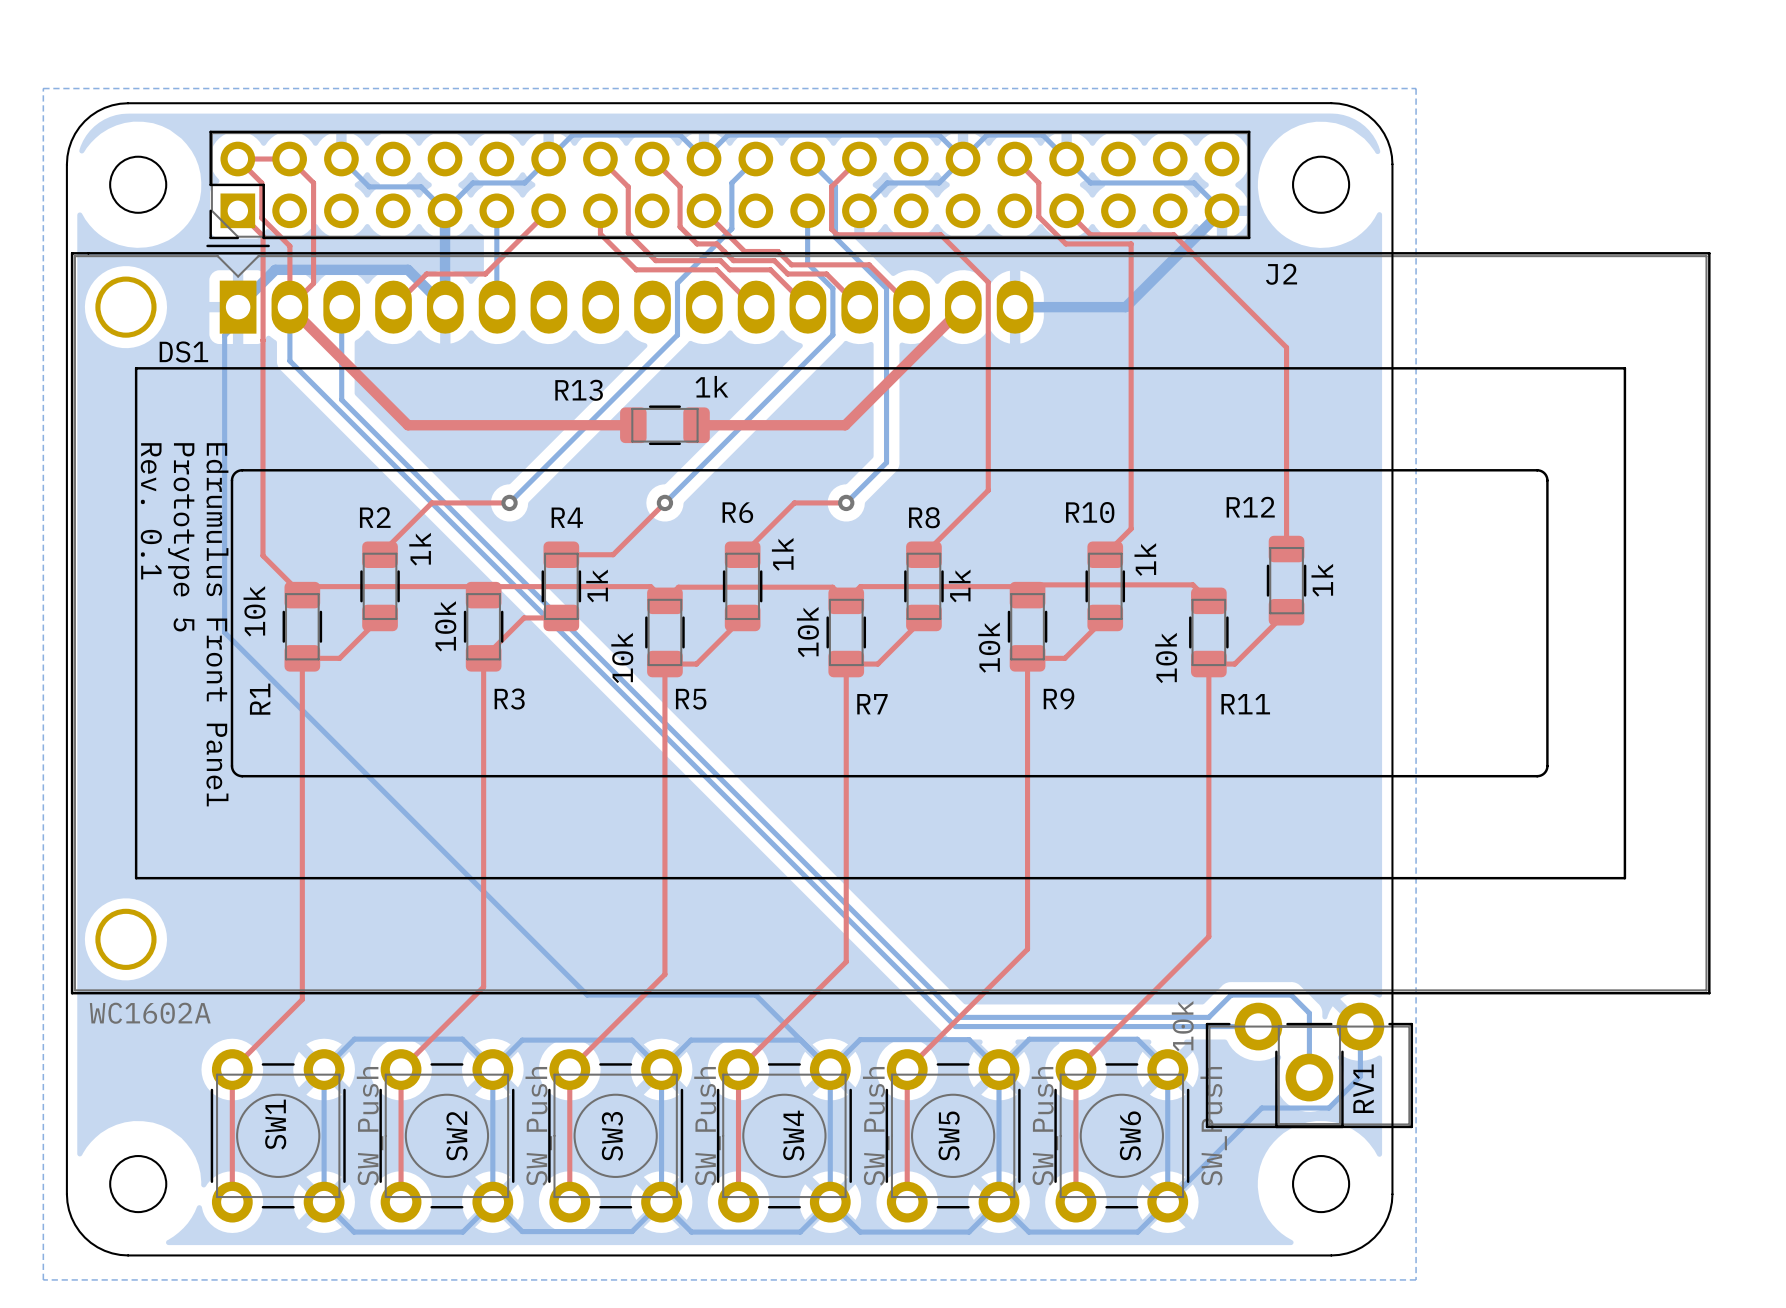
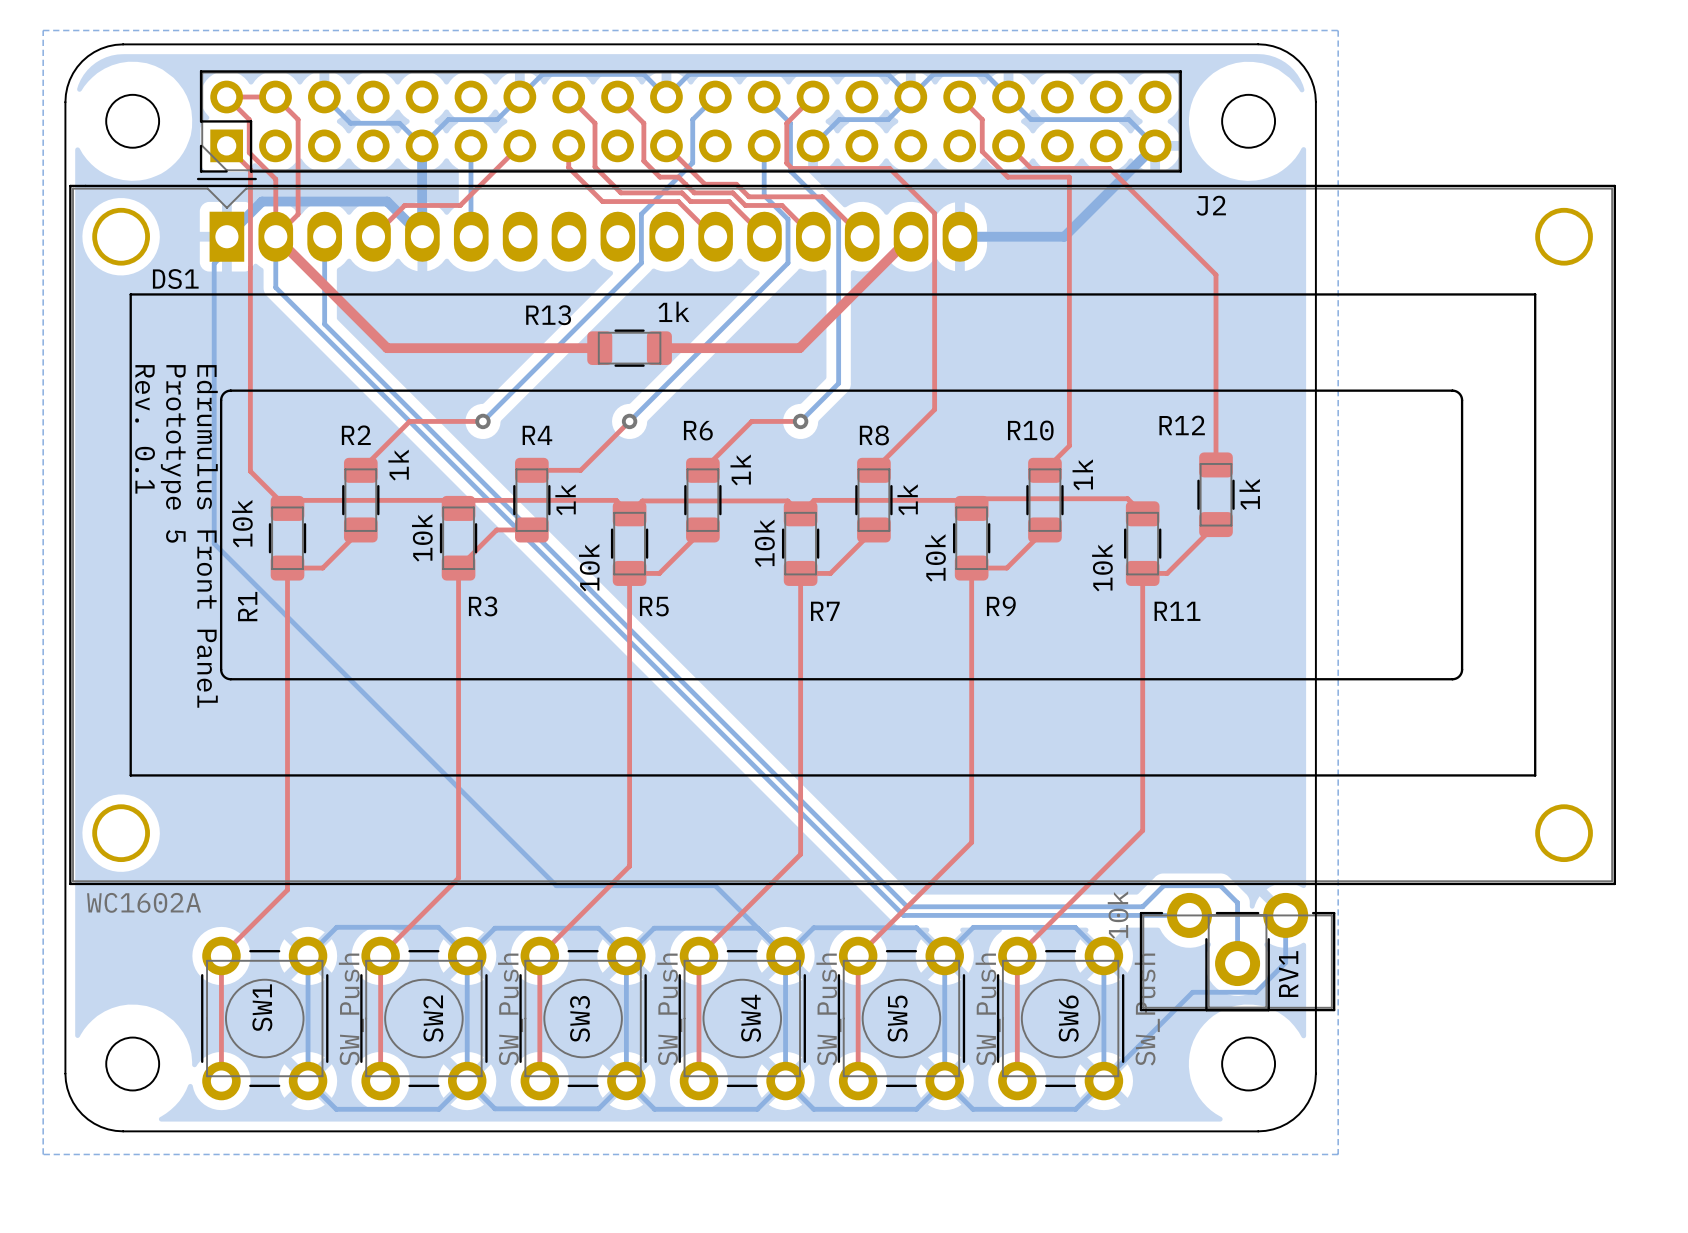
DS1 footprint: [70, 244, 1711, 995] -> [69, 177, 1616, 886]

